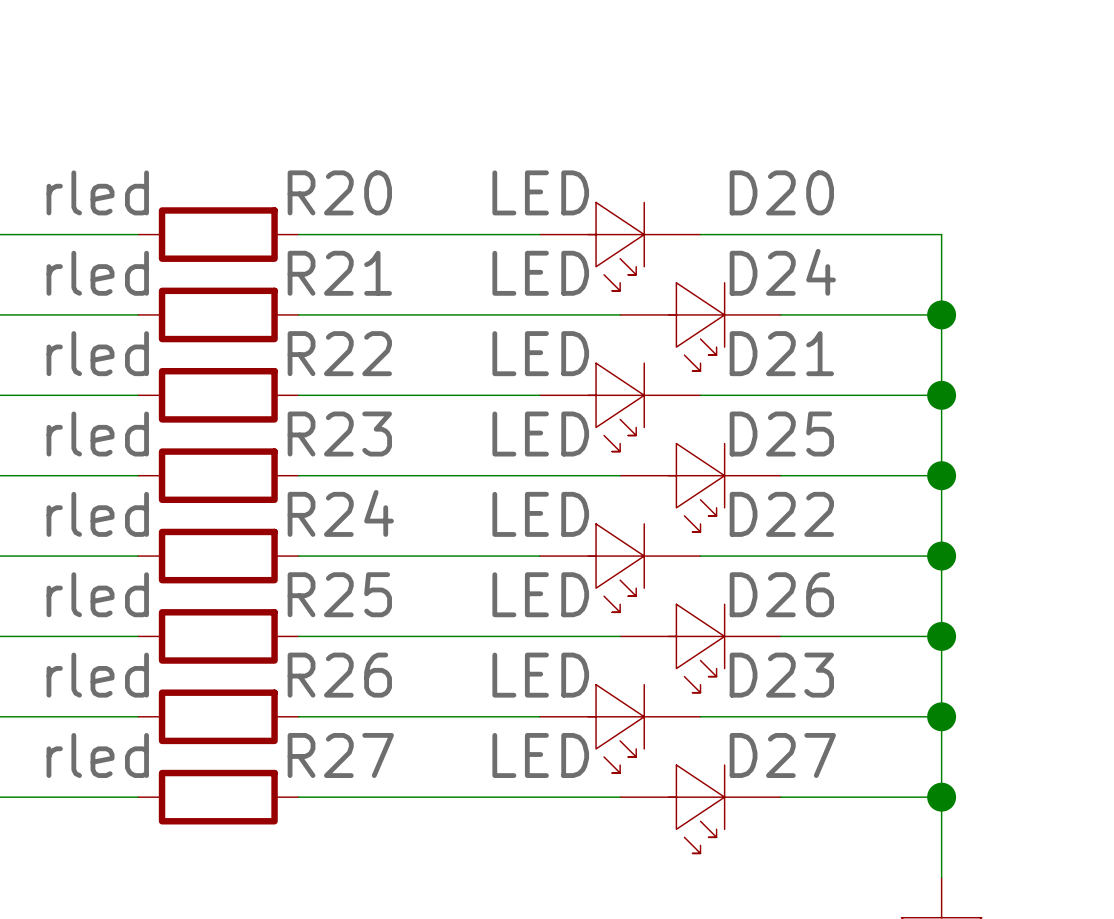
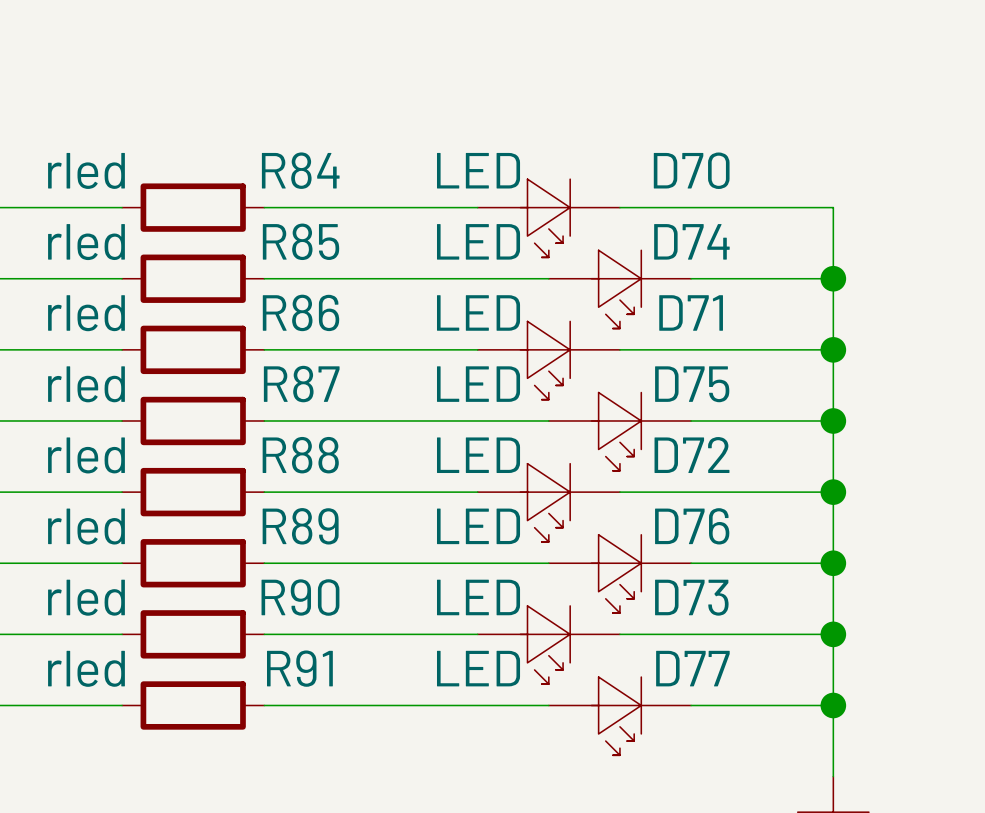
R20 name: R20 (339, 192) -> R84 (300, 170)
D20 name: D20 (781, 192) -> D70 (691, 170)
D24 name: D24 (782, 272) -> D74 (691, 241)
R21 name: R21 (339, 273) -> R85 (301, 241)
R22 name: R22 (339, 353) -> R86 (301, 312)
D21 name: D21 (781, 353) -> D71 (691, 312)
R23 name: R23 (339, 434) -> R87 (301, 384)
D25 name: D25 (781, 434) -> D75 (692, 384)
R24 name: R24 (340, 513) -> R88 (300, 455)
D22 name: D22 (781, 514) -> D72 (692, 455)
R25 name: R25 (339, 594) -> R89 (300, 526)
D26 name: D26 (781, 594) -> D76 (692, 526)
R26 name: R26 (339, 675) -> R90 (300, 597)
D23 name: D23 (781, 675) -> D73 (691, 597)
R27 name: R27 (340, 755) -> R91 (299, 668)
D27 name: D27 (782, 755) -> D77 (692, 668)

